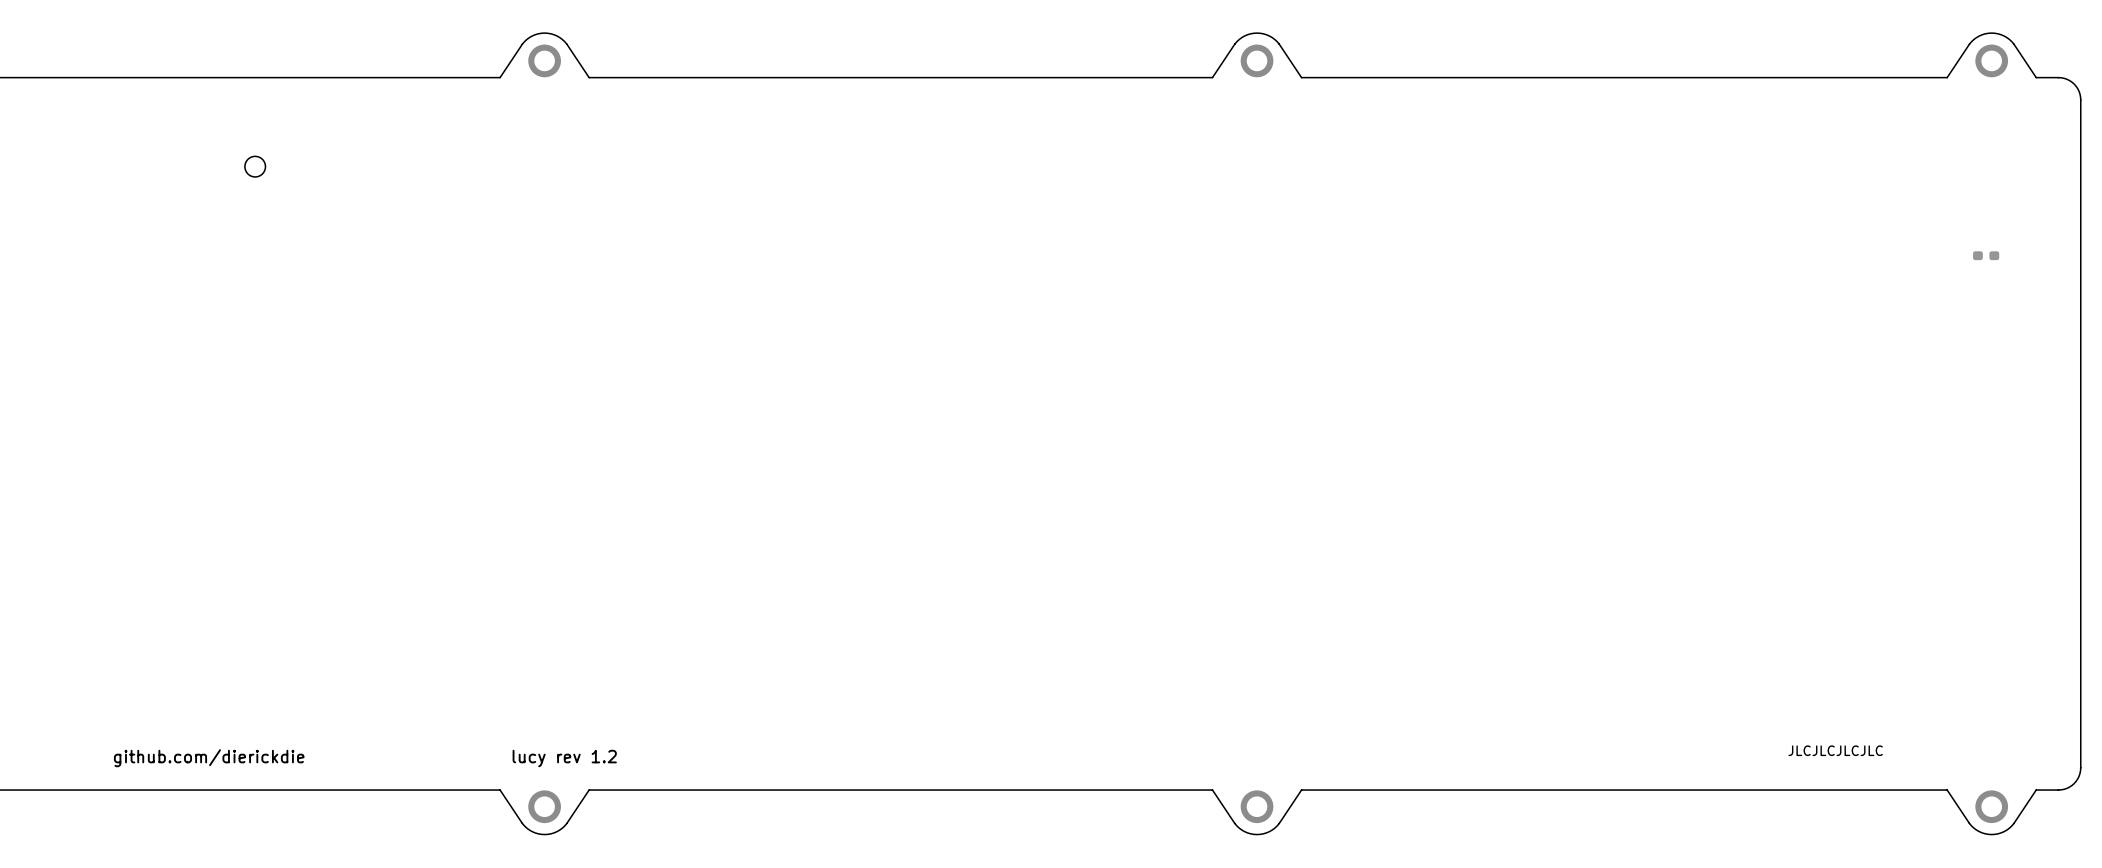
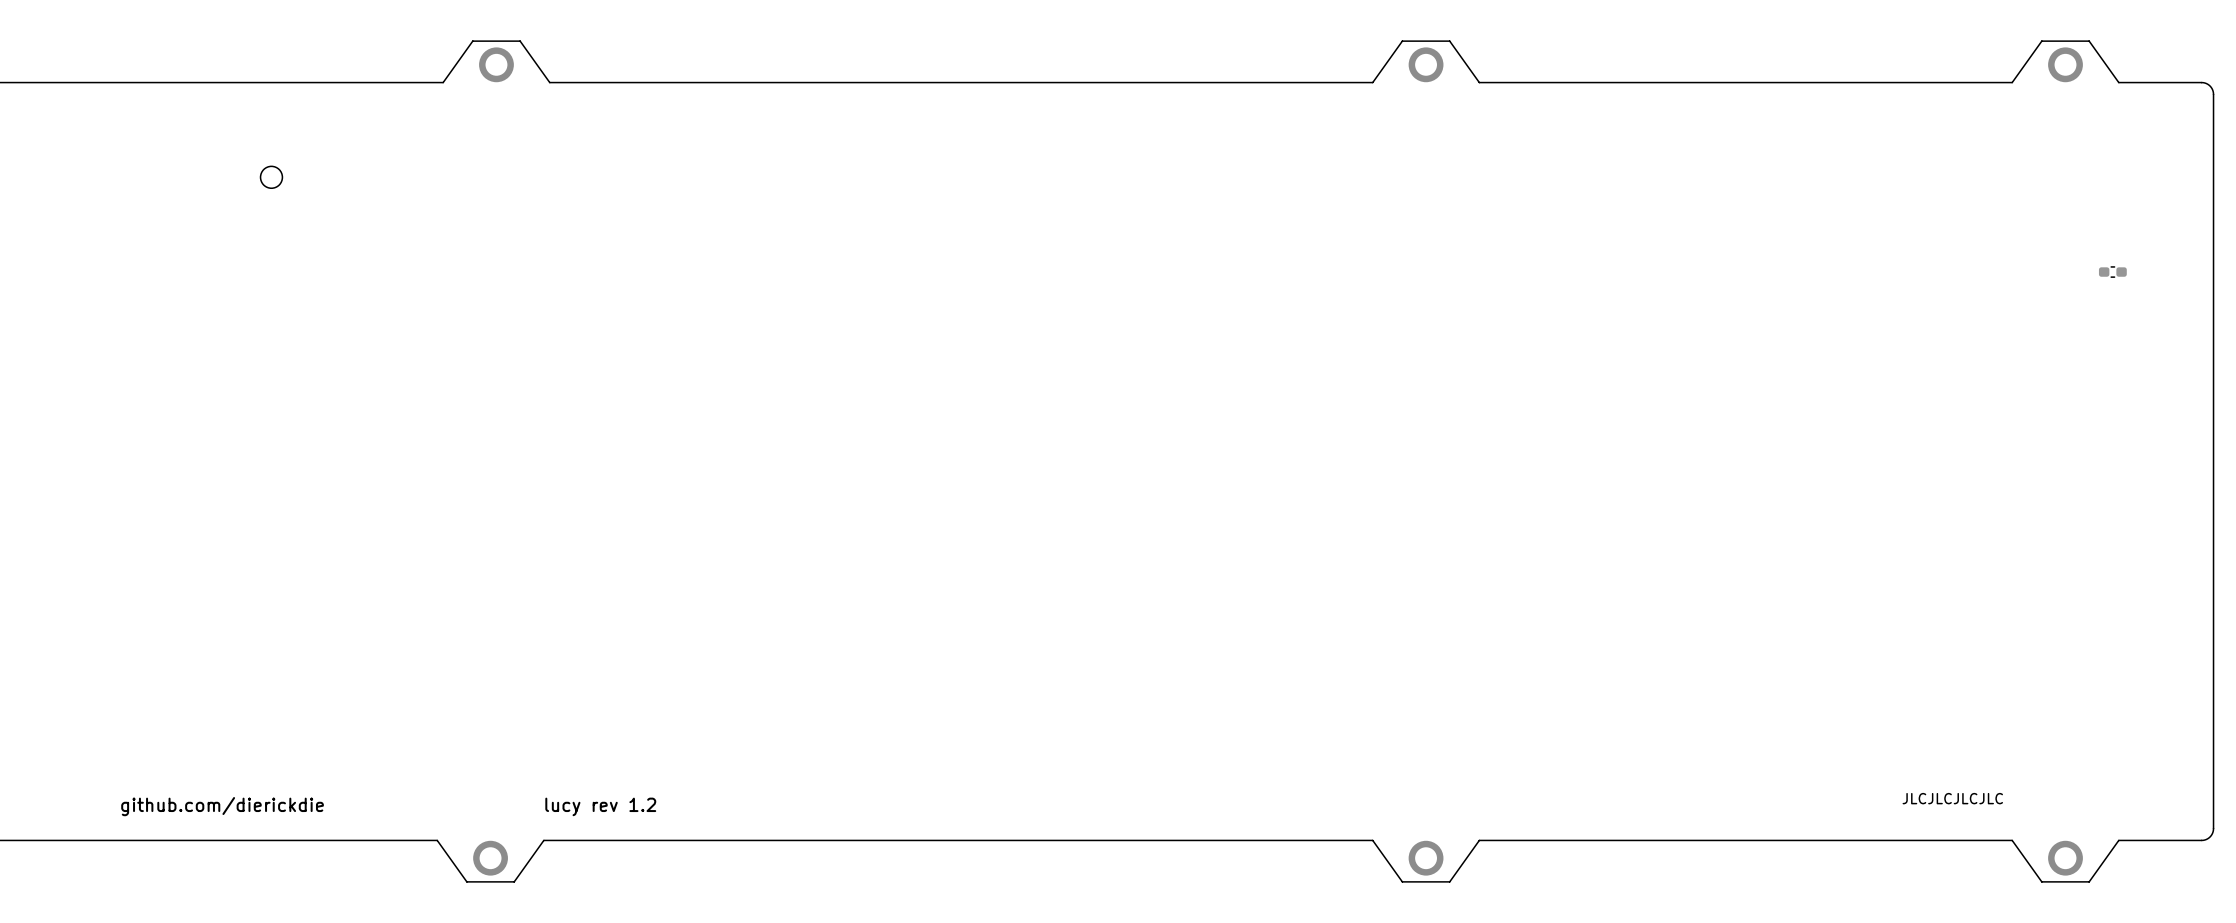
part position: (544, 60) -> (496, 64)
part position: (1257, 60) -> (1426, 64)
part position: (1991, 60) -> (2065, 64)
board edge: (416, 77) (500, 77) (524, 41) (535, 34) (544, 33) (554, 34) (564, 41) (589, 77) -> (443, 82) (472, 41) (520, 41) (549, 82) (626, 82)
board edge: (1212, 77) (1236, 41) (1244, 36) (1257, 33) (1266, 34) (1277, 41) (1301, 77) (1390, 77) -> (1289, 82) (1372, 82) (1402, 41) (1449, 41) (1479, 82)
board edge: (1891, 77) (1947, 77) (1973, 39) (1982, 34) (1994, 33) (2004, 36) (2011, 41) (2036, 77) (2061, 77) (2069, 80) (2077, 88) (2080, 99) -> (2012, 82) (2041, 41) (2089, 41) (2118, 82) (2204, 82) (2212, 89) (2213, 106)
part footprint: [1973, 251, 2000, 261] -> [2098, 266, 2127, 278]
board edge: (2080, 767) (2077, 778) (2069, 787) (2061, 789) (2036, 790) (2011, 825) (2004, 831) (1994, 834) (1985, 833) (1973, 828) (1947, 790) (1891, 790) -> (2213, 816) (2212, 833) (2204, 840) (2118, 840) (2089, 881) (2041, 881) (2012, 840)
board edge: (411, 790) (500, 790) (524, 825) (532, 831) (544, 834) (557, 831) (564, 825) (589, 790) -> (437, 840) (466, 881) (514, 881) (543, 840) (626, 840)
board edge: (1212, 790) (1236, 825) (1244, 831) (1257, 834) (1269, 831) (1277, 825) (1301, 790) (1390, 790) -> (1289, 840) (1372, 840) (1402, 881) (1449, 881) (1479, 840)
part position: (544, 806) -> (490, 858)
part position: (1257, 806) -> (1426, 858)
part position: (1991, 806) -> (2065, 858)

